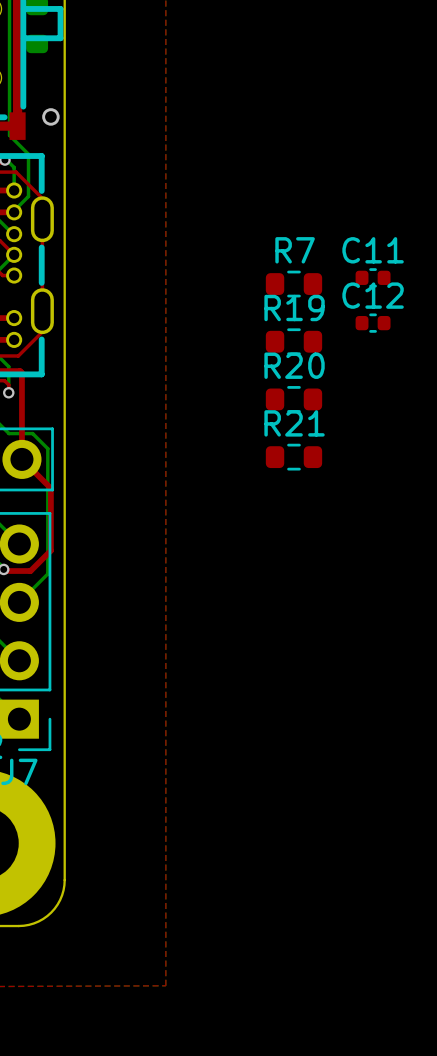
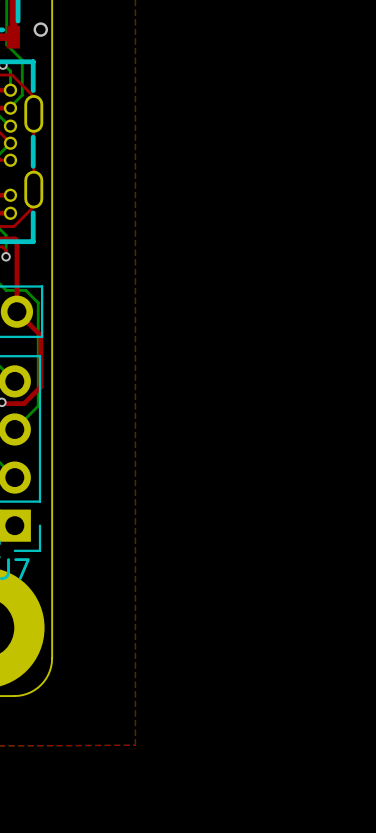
C11: (373, 277) -> none
R7: (293, 284) -> none
C12: (373, 323) -> none
R19: (293, 341) -> none
R20: (293, 399) -> none
R21: (293, 457) -> none

